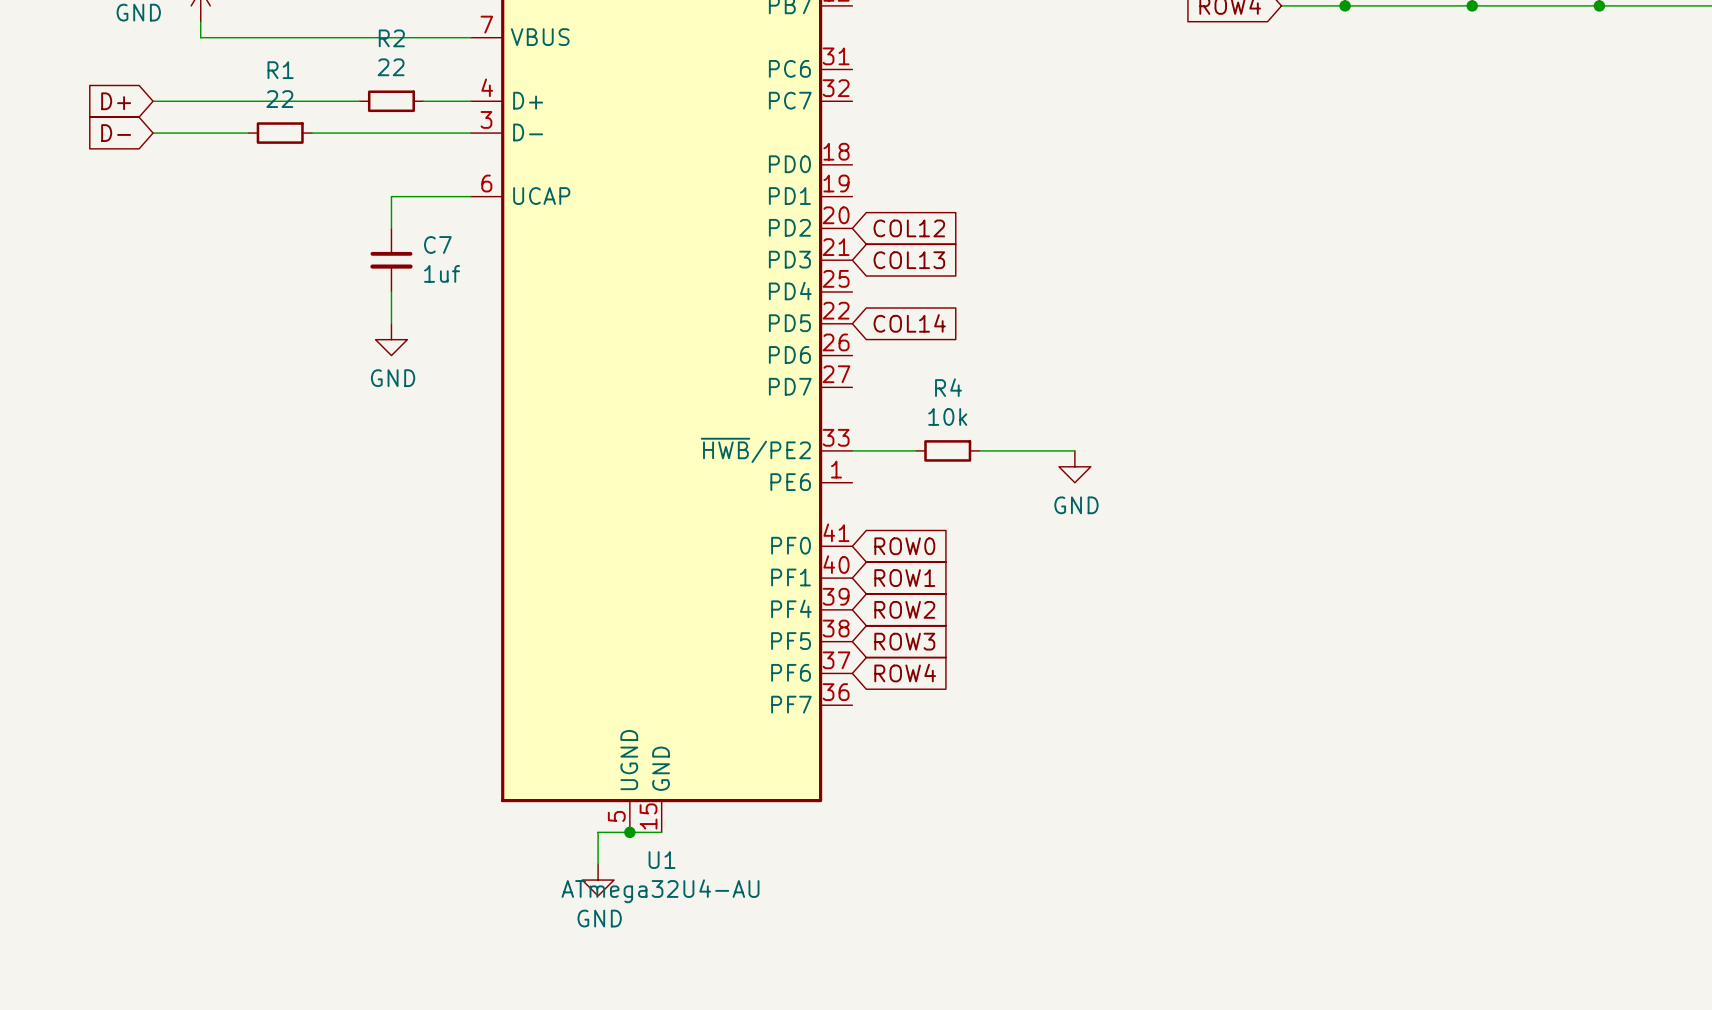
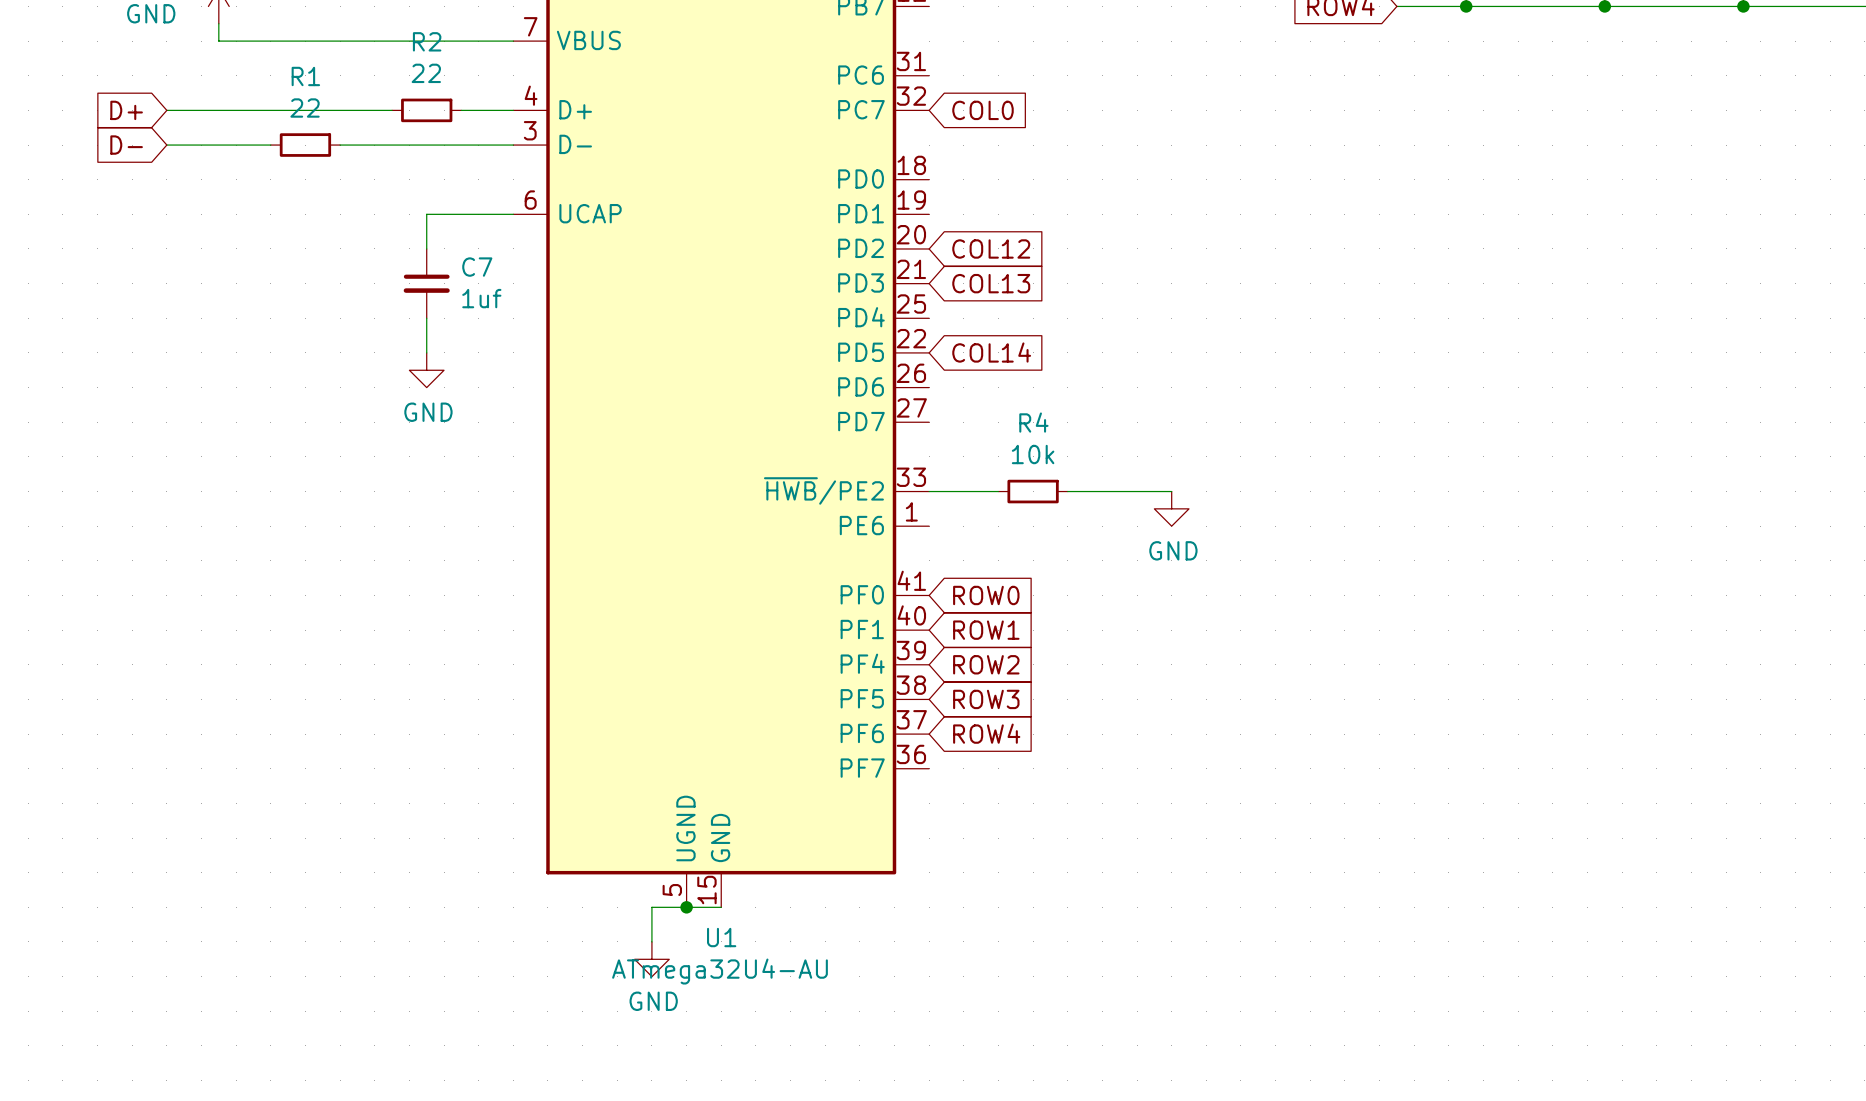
global label: none -> COL0 (983, 110)

